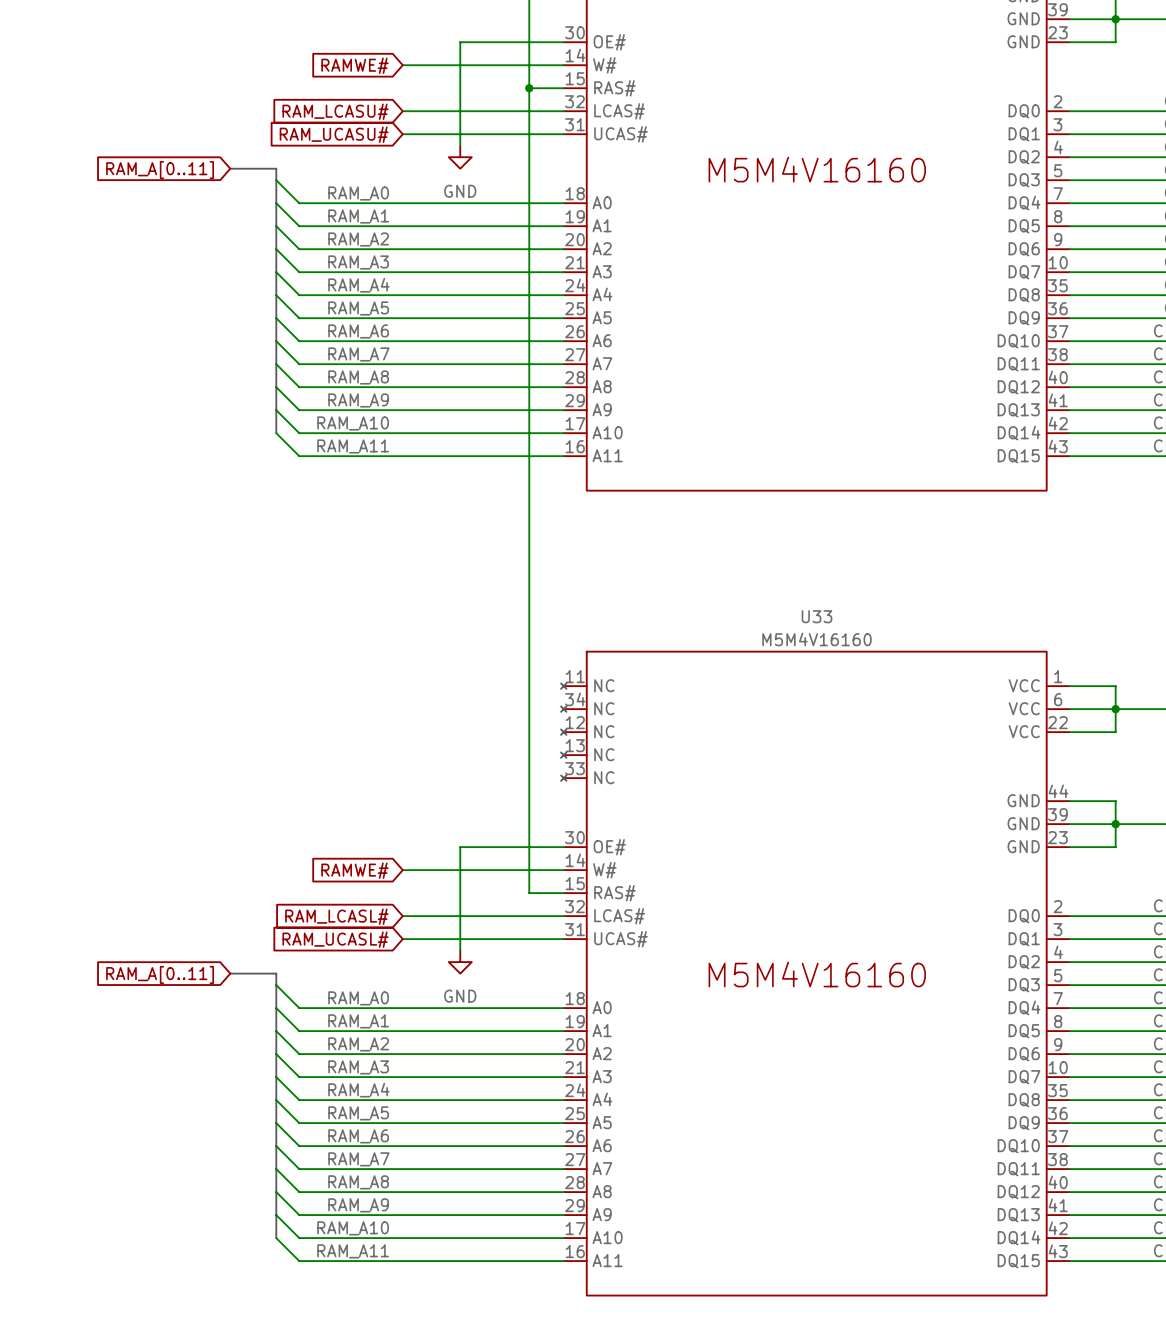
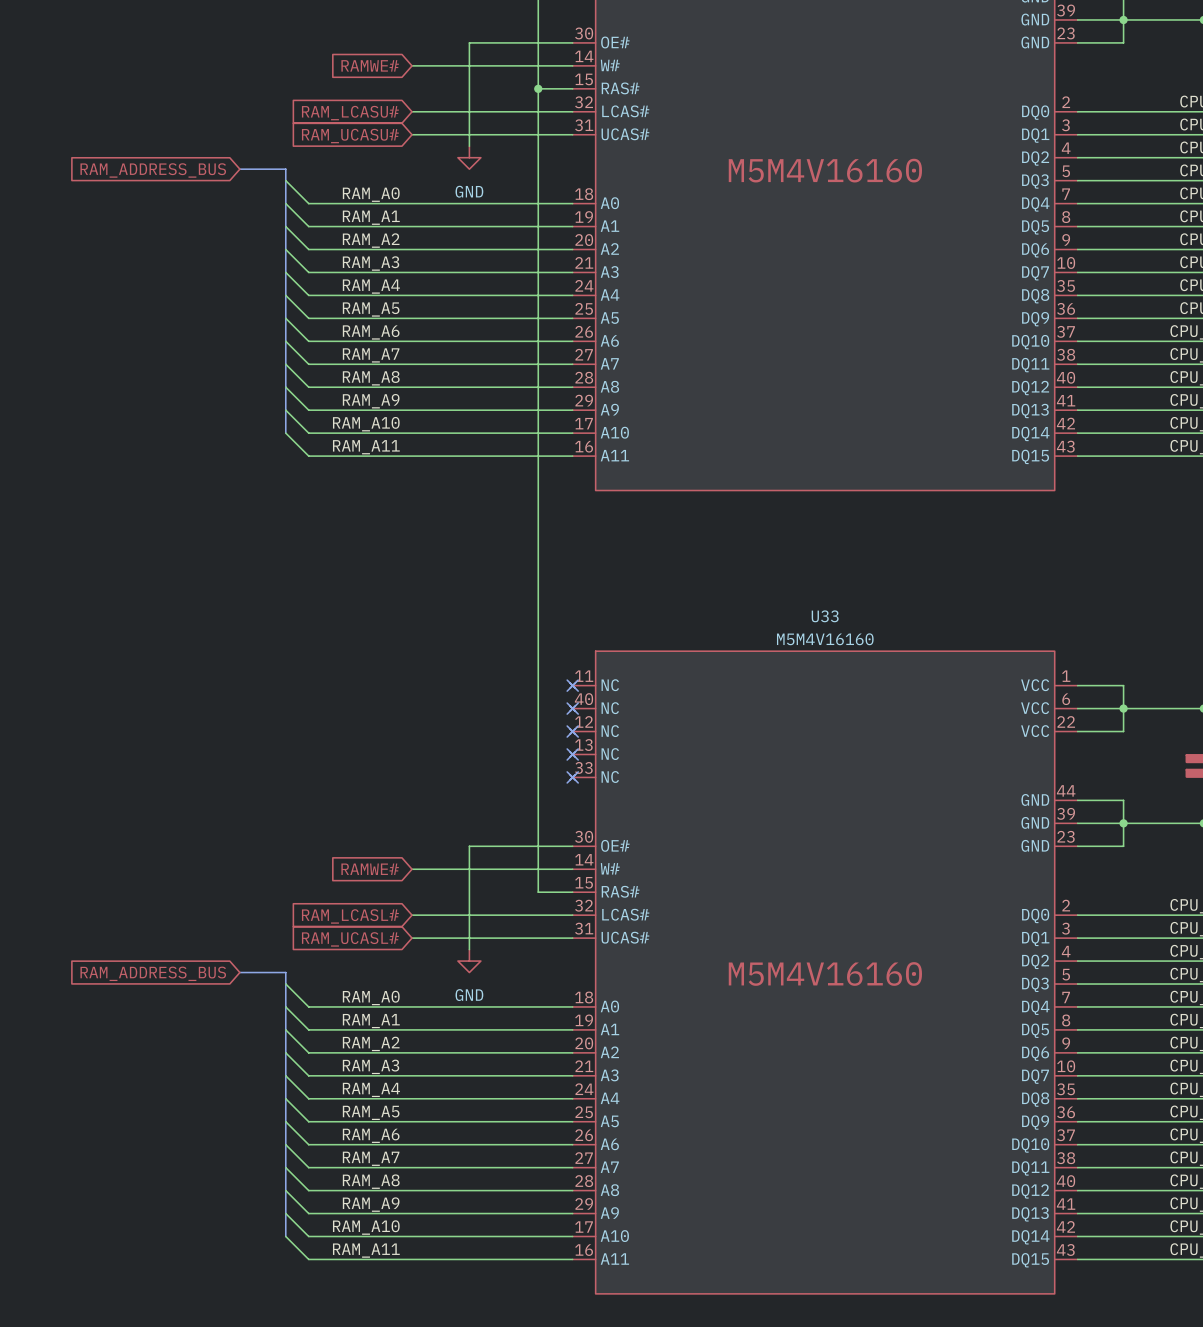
global label: RAM_A[0..11] (160, 170) -> RAM_ADDRESS_BUS (153, 170)
no-connect mark: none -> (572, 685)
U33 pin number: 34 (575, 699) -> 40 (583, 699)
no-connect mark: none -> (572, 708)
no-connect mark: none -> (572, 731)
no-connect mark: none -> (572, 754)
no-connect mark: none -> (572, 777)
global label: RAM_A[0..11] (160, 974) -> RAM_ADDRESS_BUS (153, 973)

